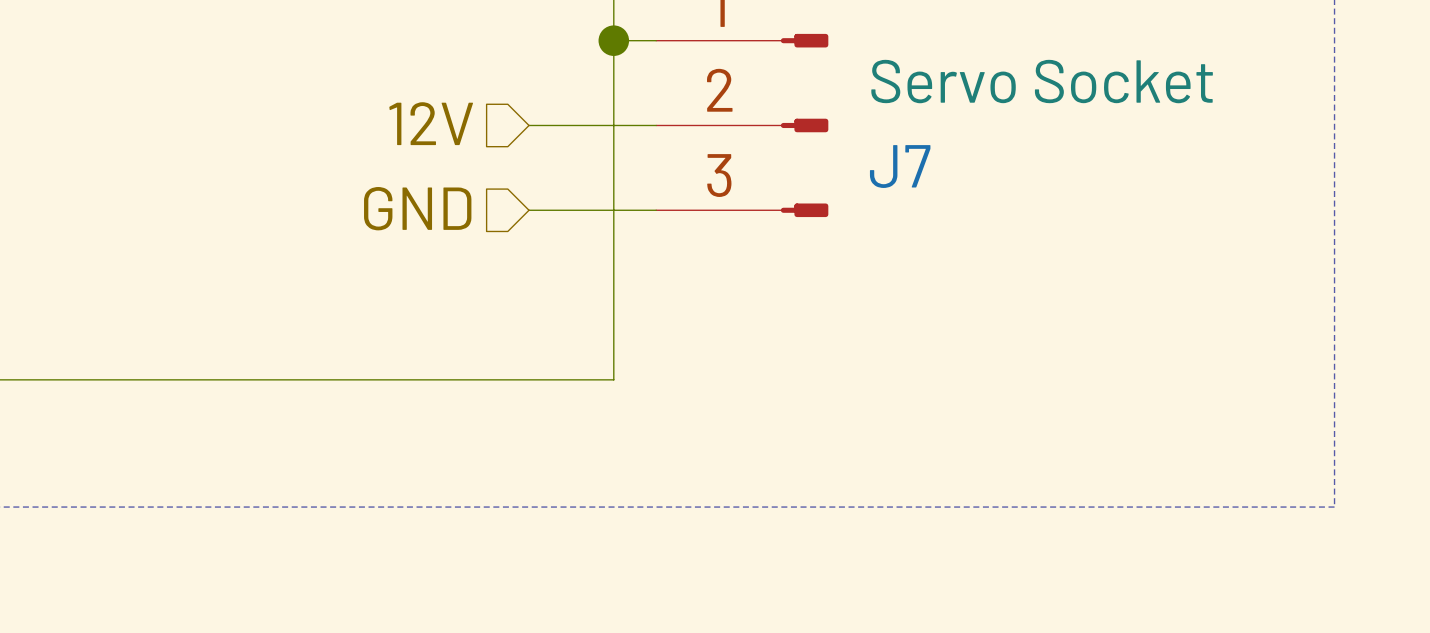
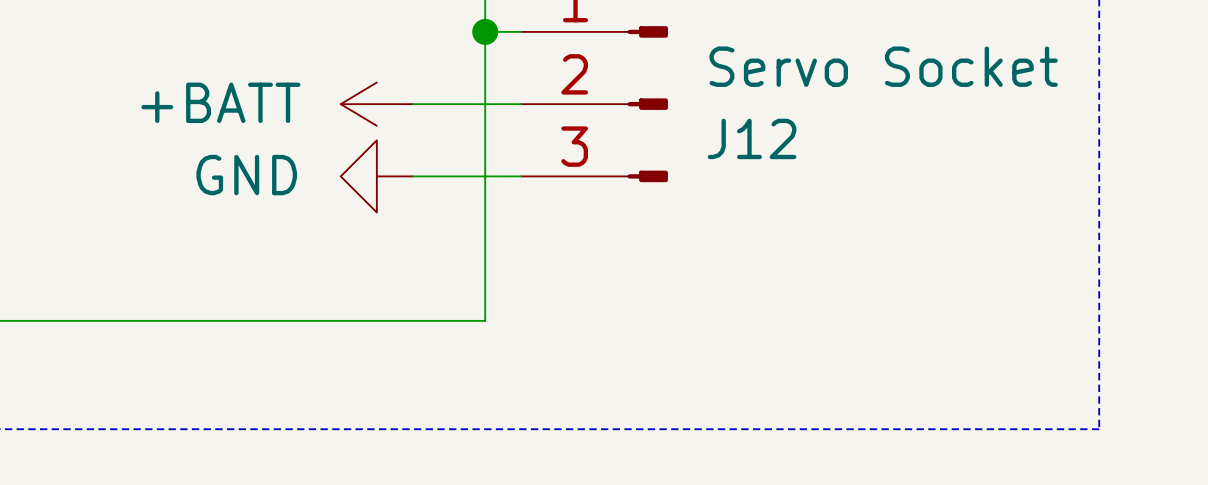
hierarchical label: 12V (431, 123) -> none
power symbol: none -> +BATT (376, 104)
J7 name: J7 (900, 166) -> J12 (752, 138)
hierarchical label: GND (417, 208) -> none
power symbol: none -> GND (376, 176)

